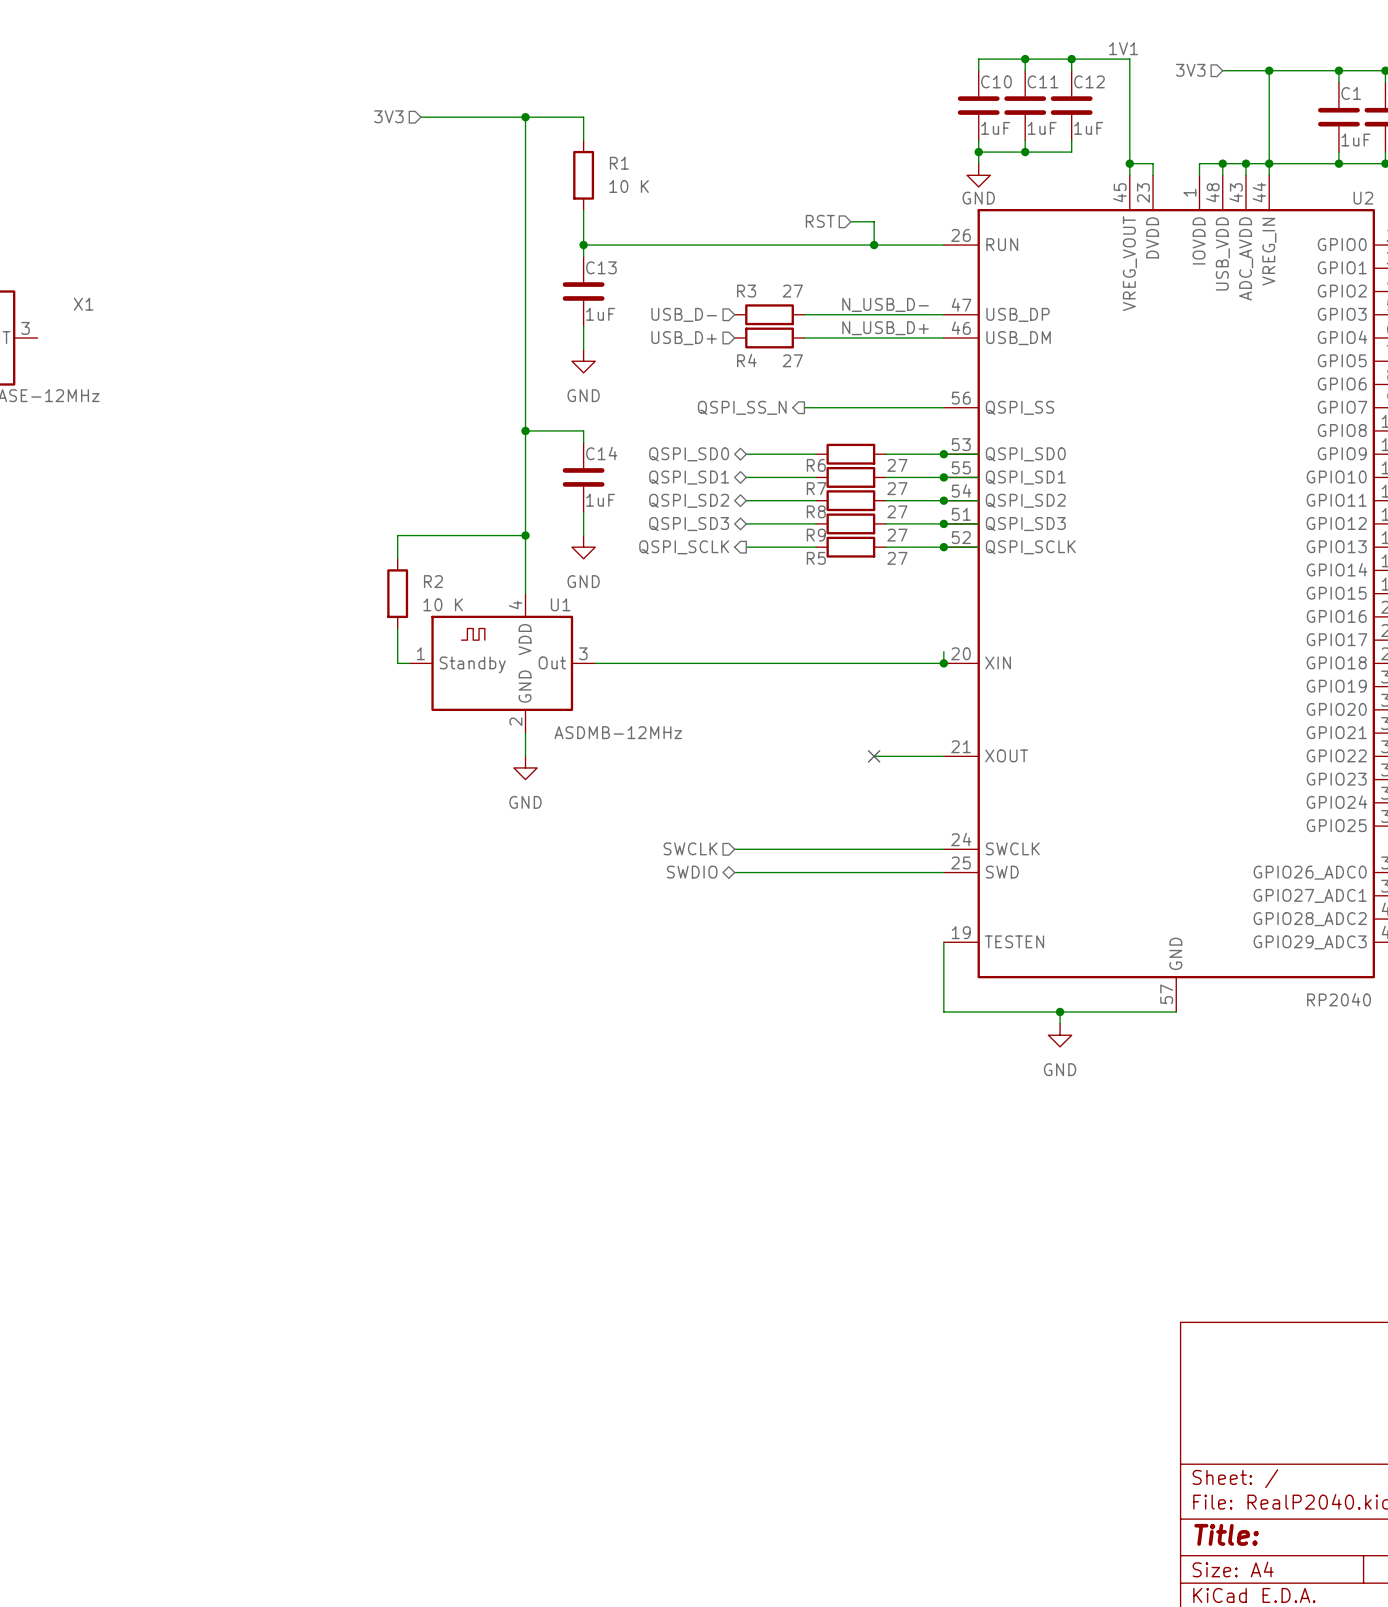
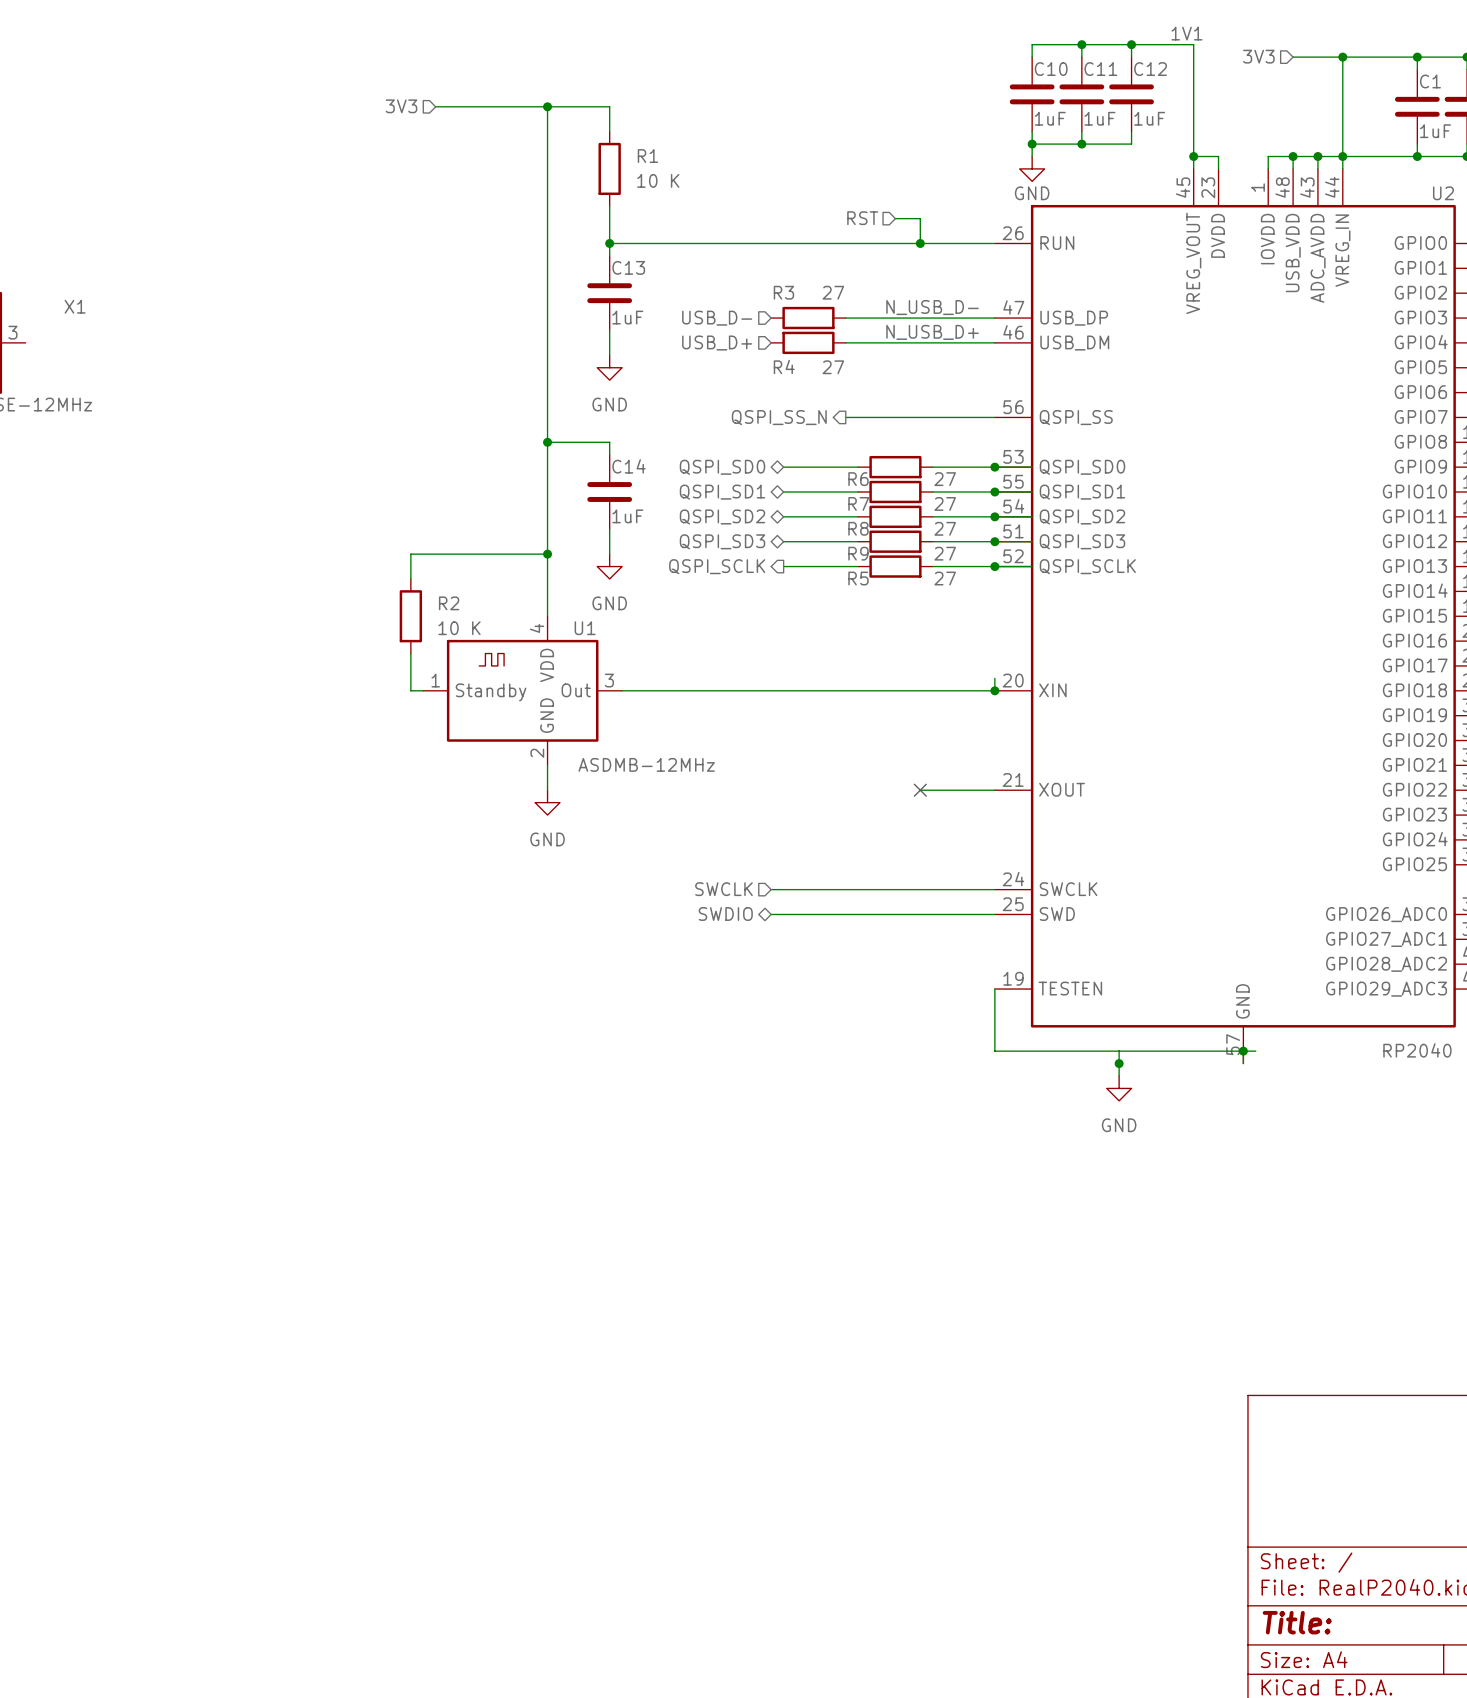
wire: (943, 1000) (943, 1012) (1176, 1012) -> (994, 1051) (1255, 1051)
wire: none -> (1119, 1051) (1119, 1063)
junction: none -> (1243, 1051)

